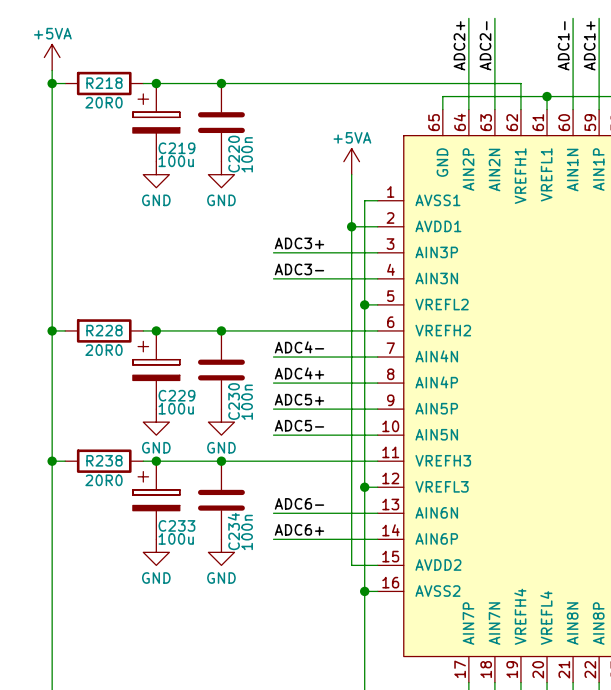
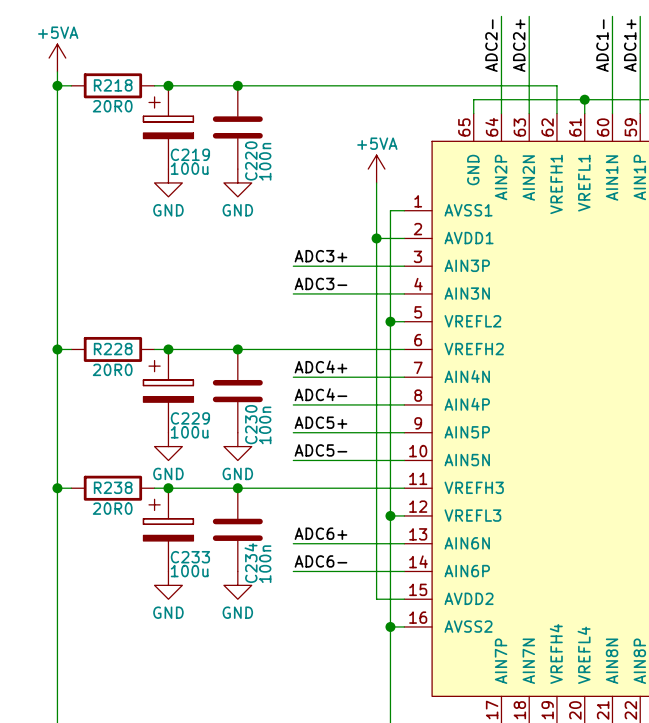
label: ADC2+ (459, 45) -> ADC2- (491, 45)
label: ADC2- (485, 45) -> ADC2+ (519, 45)
label: ADC4- (299, 347) -> ADC4+ (320, 366)
label: ADC4+ (299, 373) -> ADC4- (320, 394)
label: ADC6- (299, 503) -> ADC6+ (320, 533)
label: ADC6+ (299, 529) -> ADC6- (320, 561)

